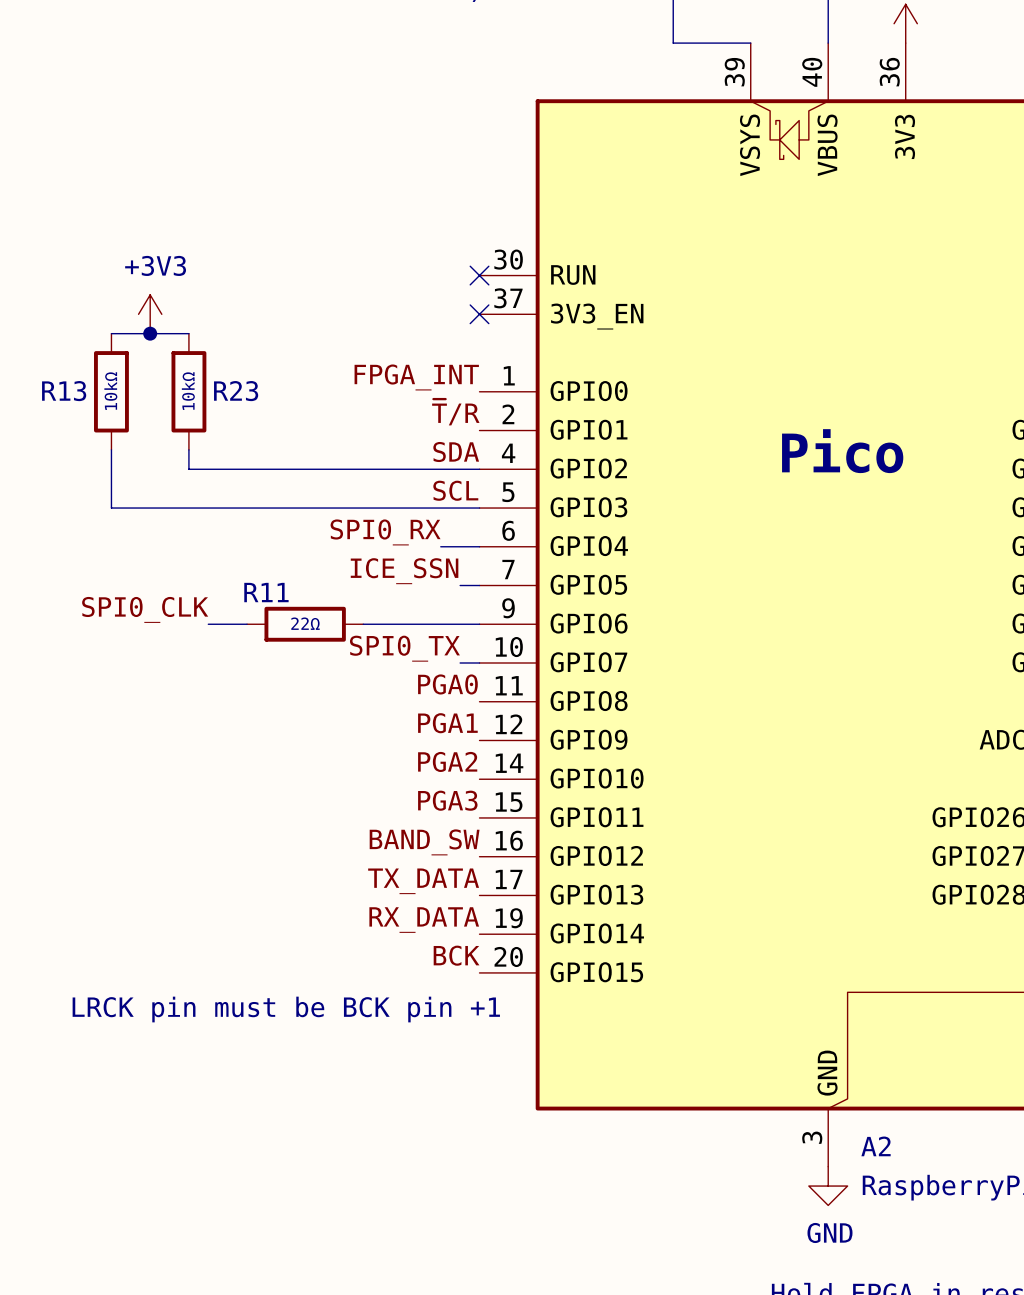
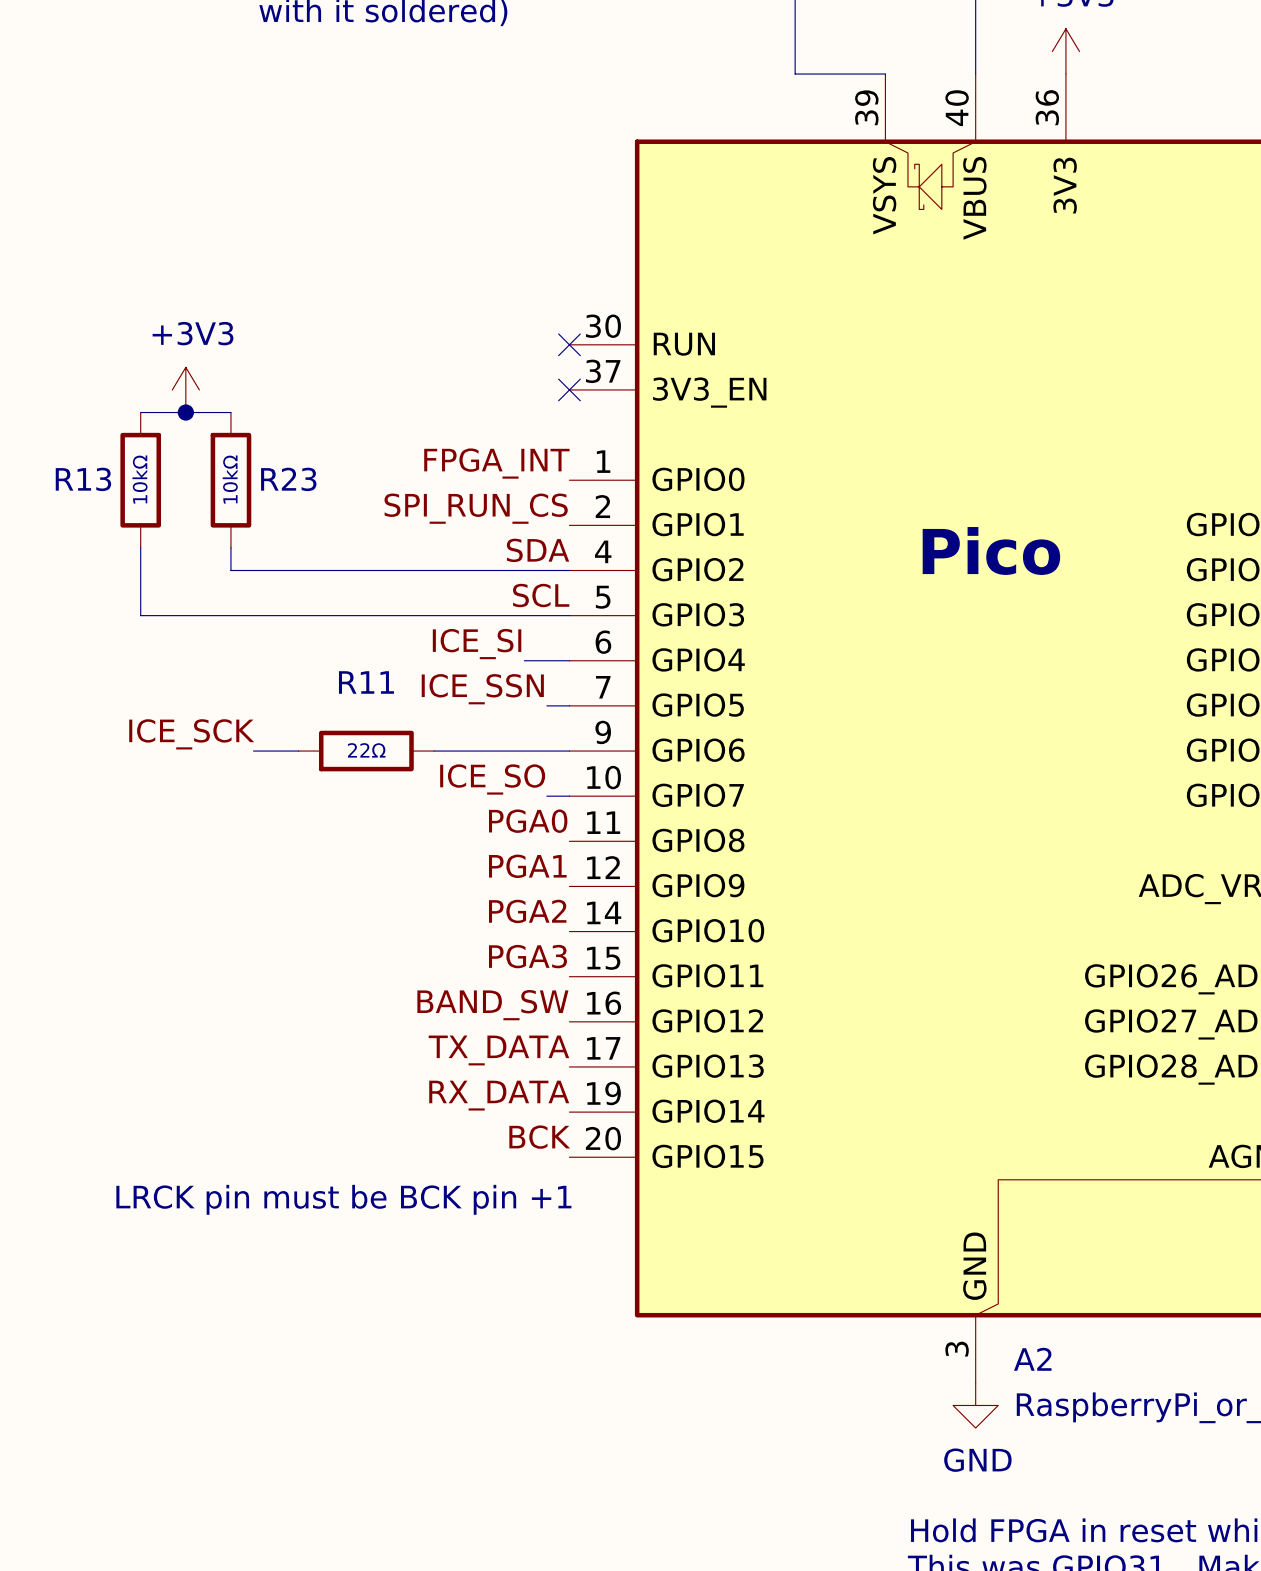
label: ~{T}/R (455, 412) -> SPI_RUN_CS (476, 508)
label: SPI0_RX (385, 532) -> ICE_SI (477, 644)
R11 name position: R11 (266, 592) -> R11 (366, 682)
label: SPI0_CLK (145, 609) -> ICE_SCK (191, 734)
label: SPI0_TX (404, 648) -> ICE_SO (492, 779)

